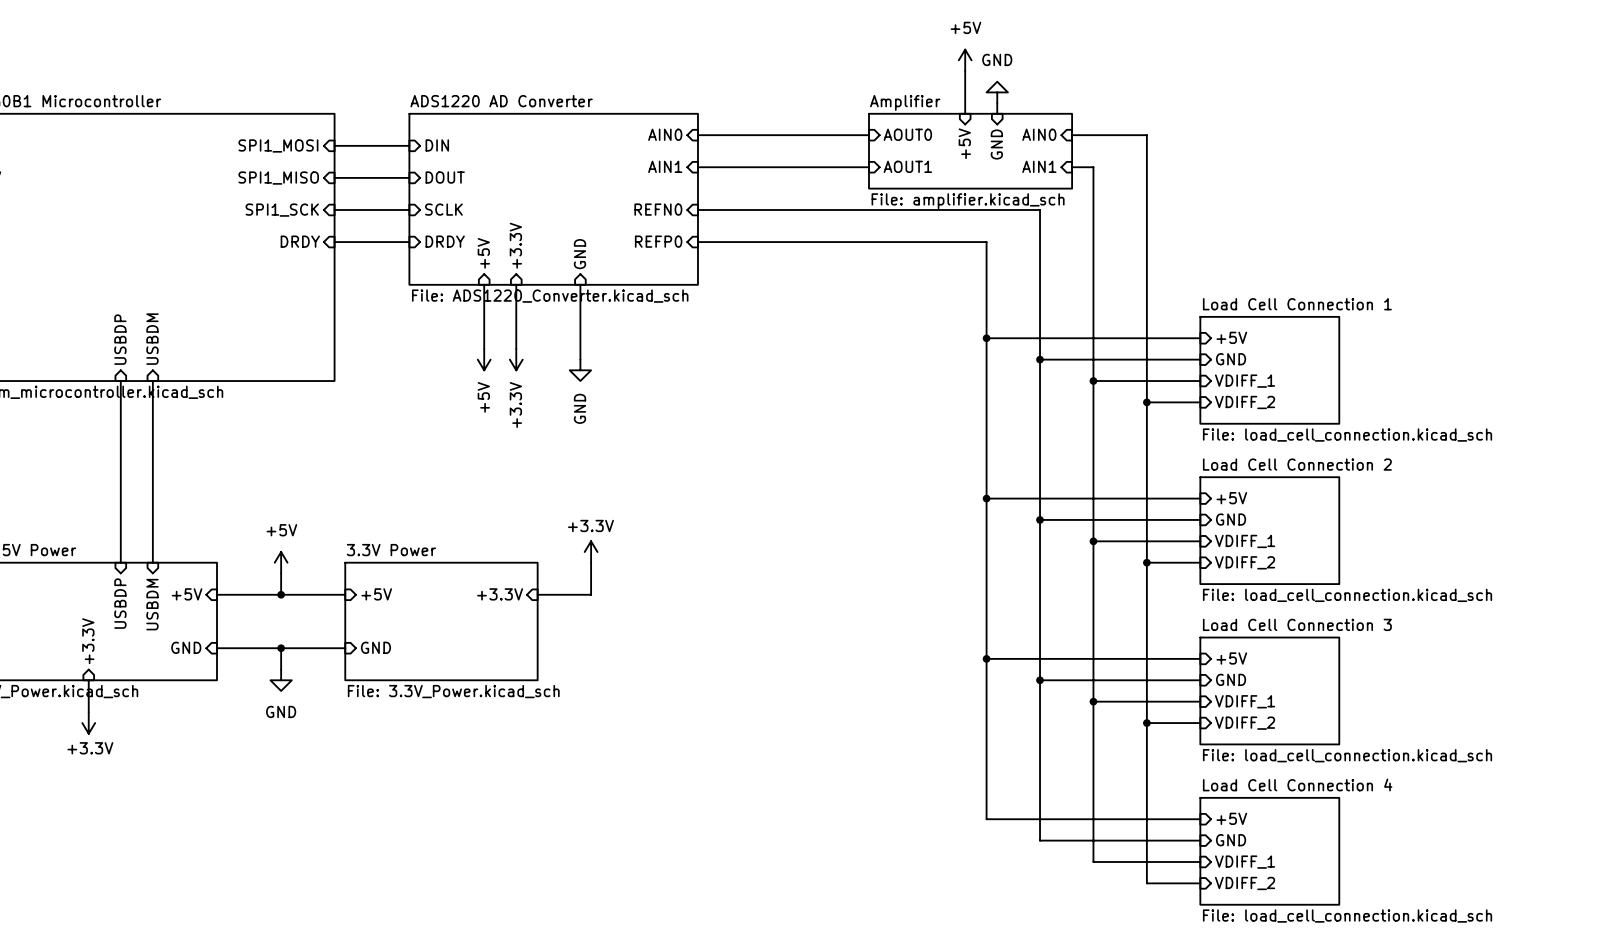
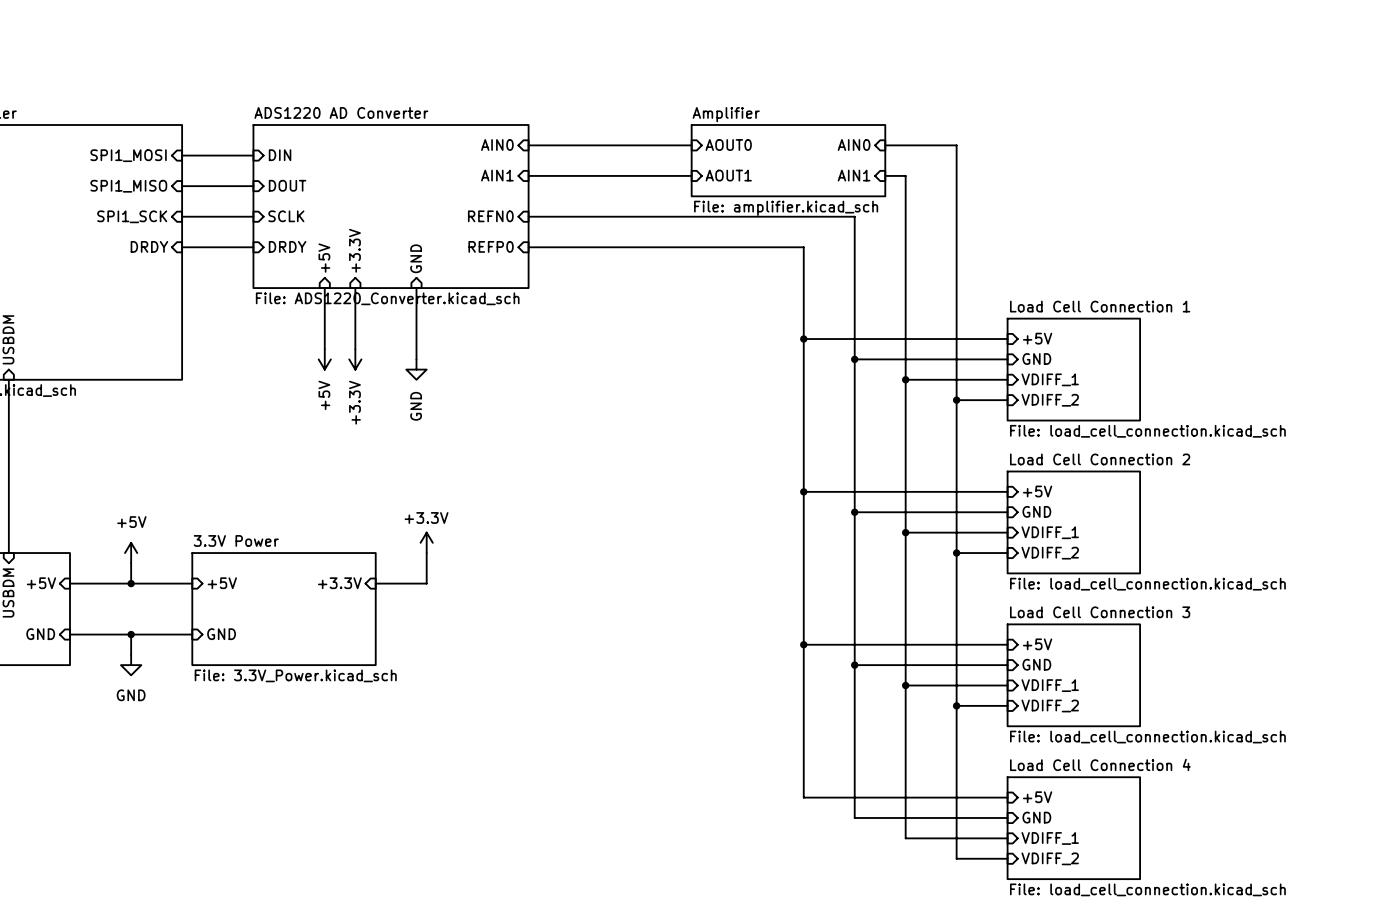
power symbol: +5V (965, 60) -> none
wire: (965, 71) (965, 113) -> none
power symbol: GND (997, 92) -> none
wire: (997, 103) (997, 113) -> none
sheet pin: +5V (964, 143) -> none
sheet pin: GND (996, 144) -> none

